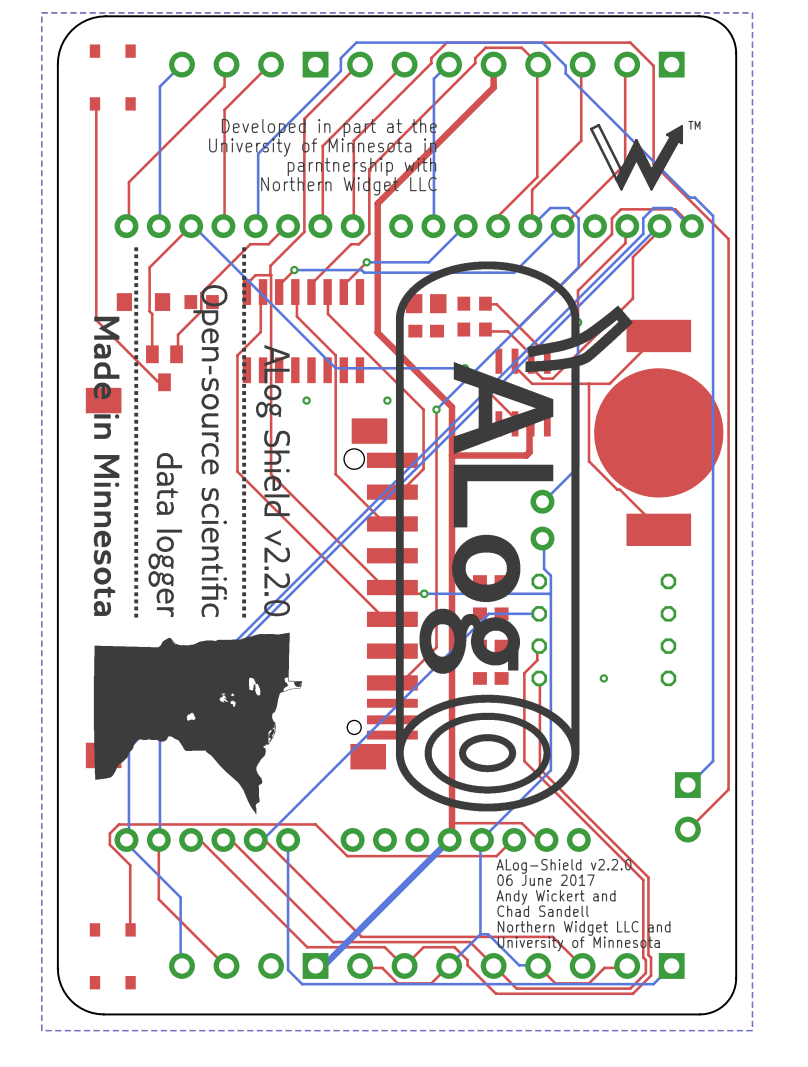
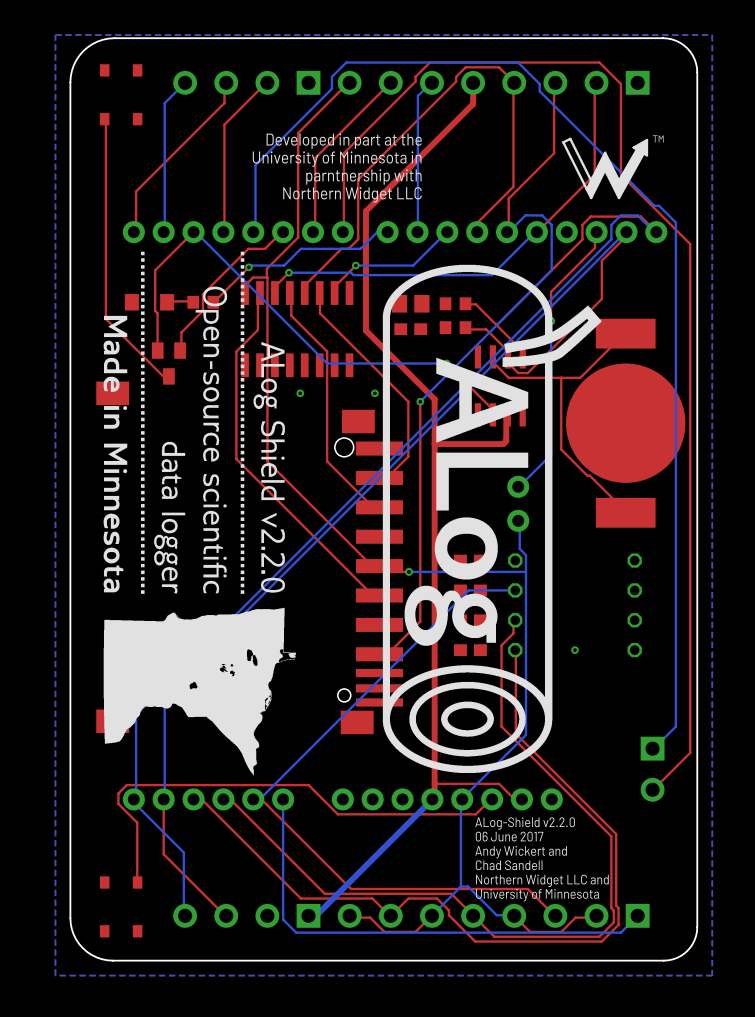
bottom track: none -> (387, 232) (377, 232) (360, 248) (300, 248) (284, 265) (250, 265) (248, 267)
top track: none -> (248, 267) (213, 302)
via: none -> (248, 267)
top track: none -> (193, 302) (167, 302)

